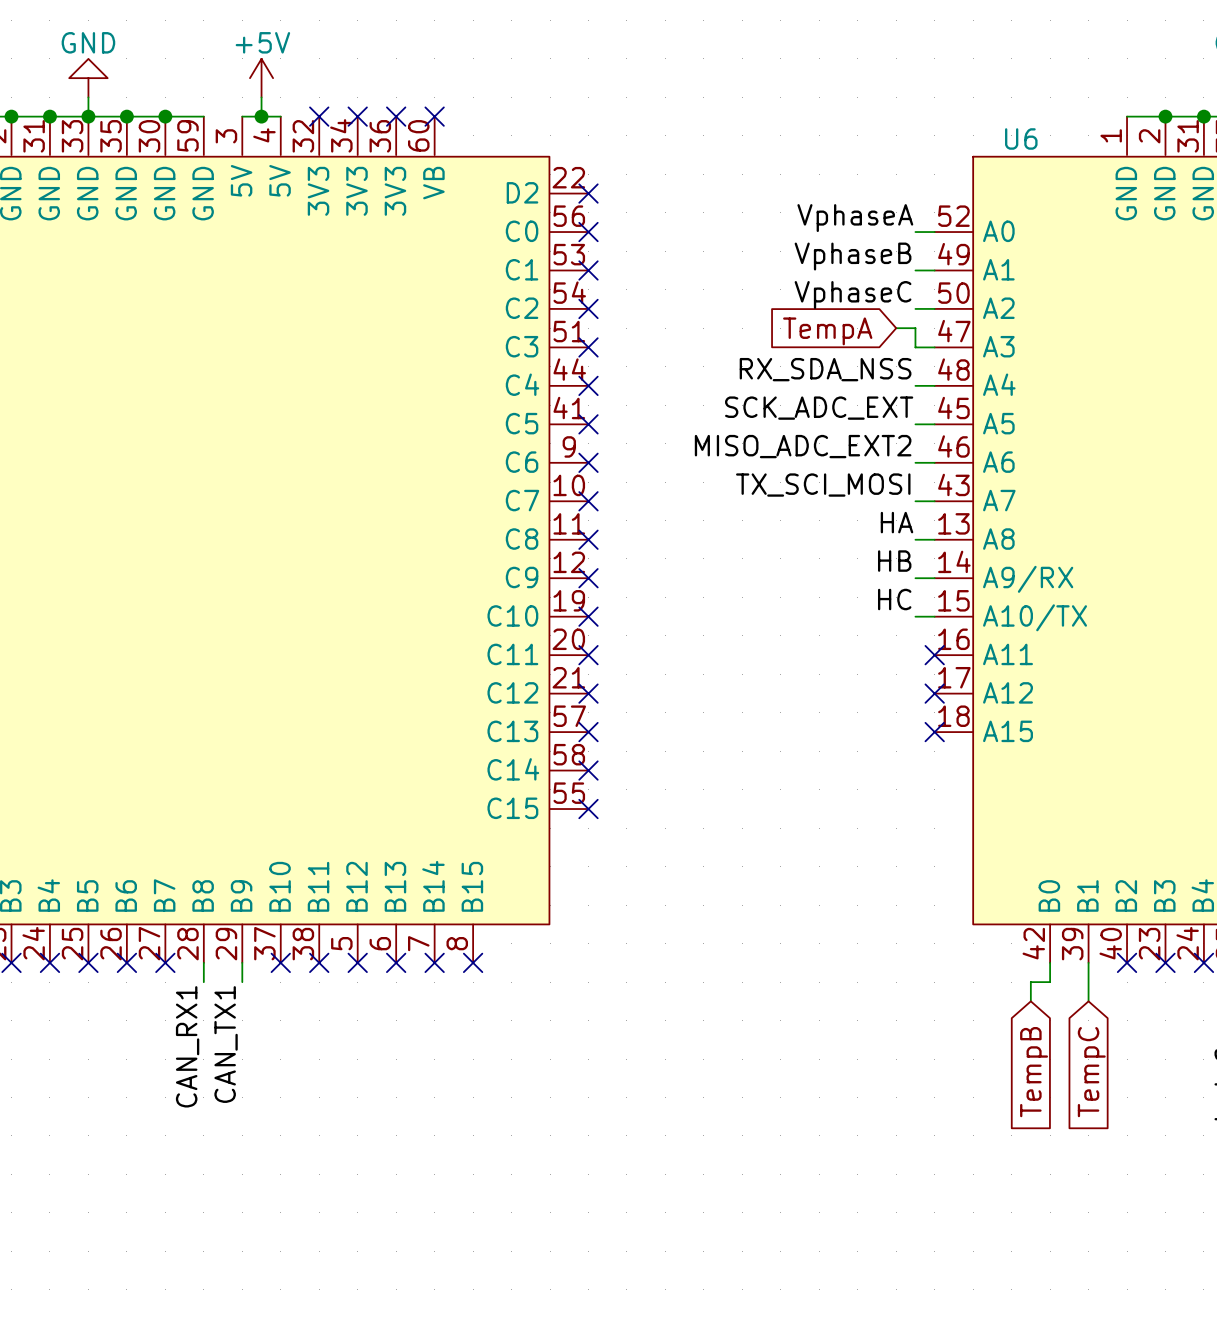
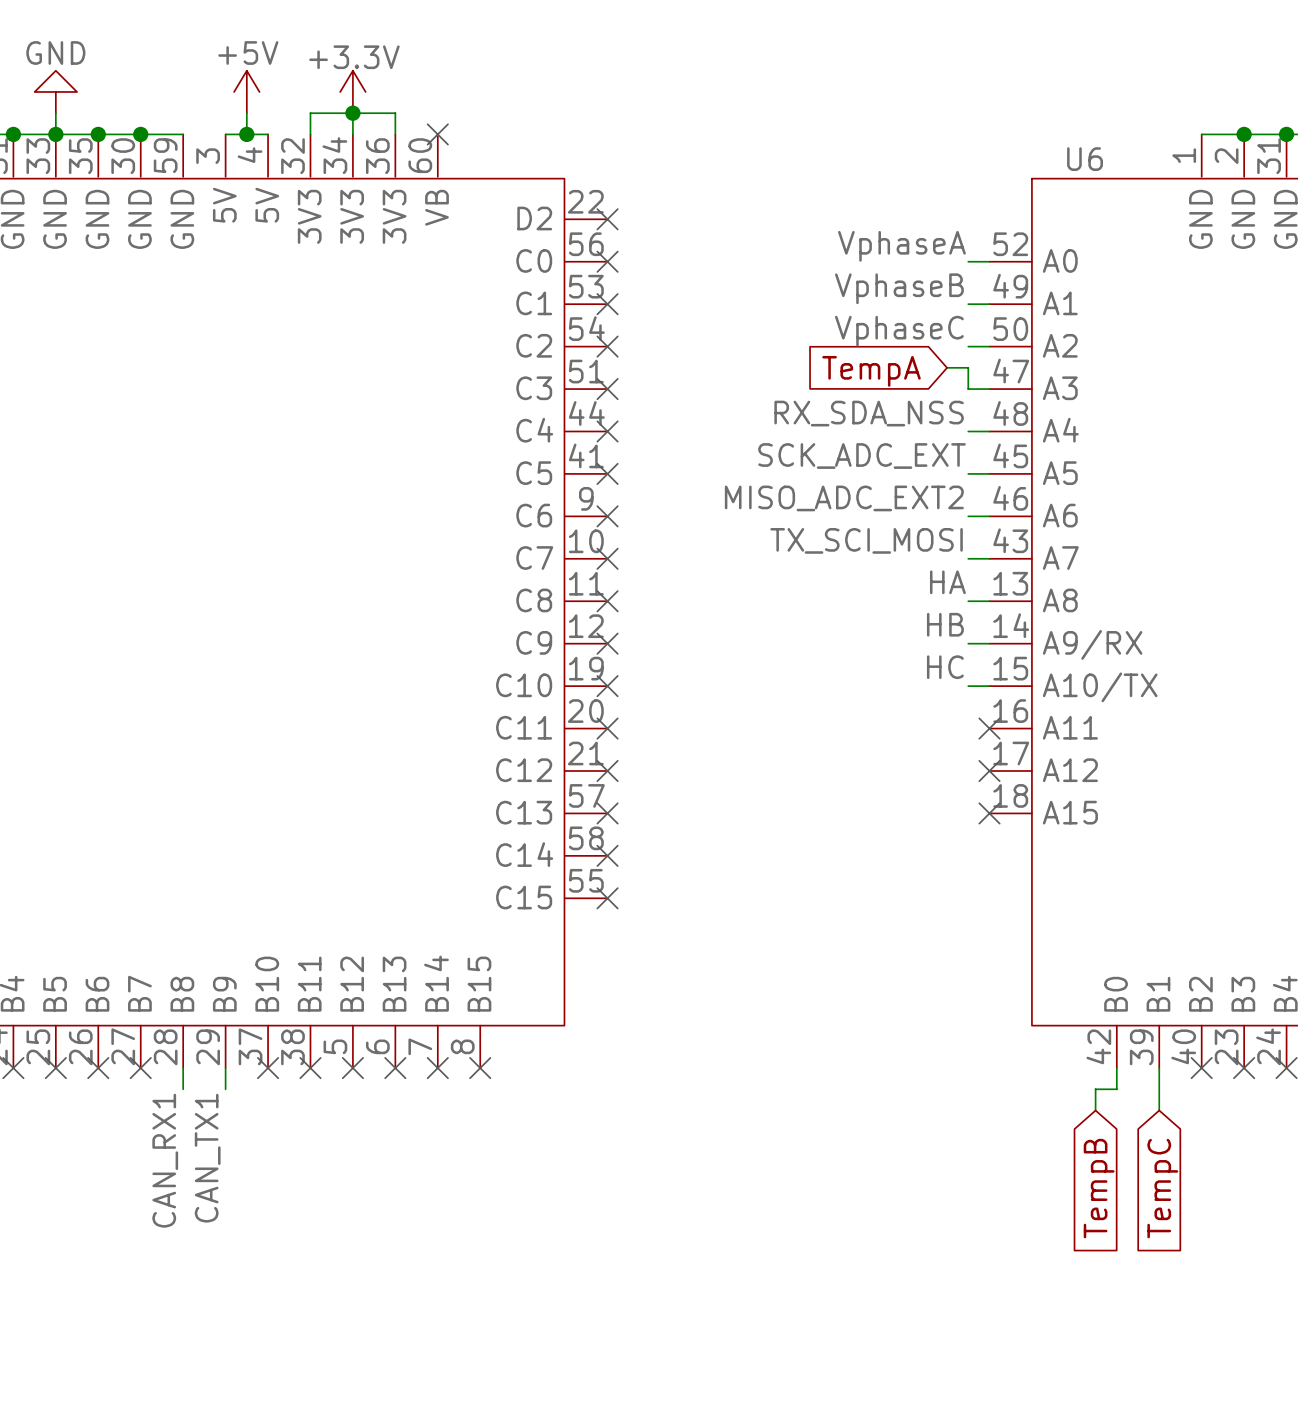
power symbol: none -> +3.3V (352, 91)
wire: none -> (352, 113) (352, 134)
junction: none -> (352, 113)
wire: none -> (310, 134) (310, 113) (395, 113) (395, 134)
no-connect mark: (319, 116) -> none
no-connect mark: (357, 116) -> none
no-connect mark: (396, 116) -> none

